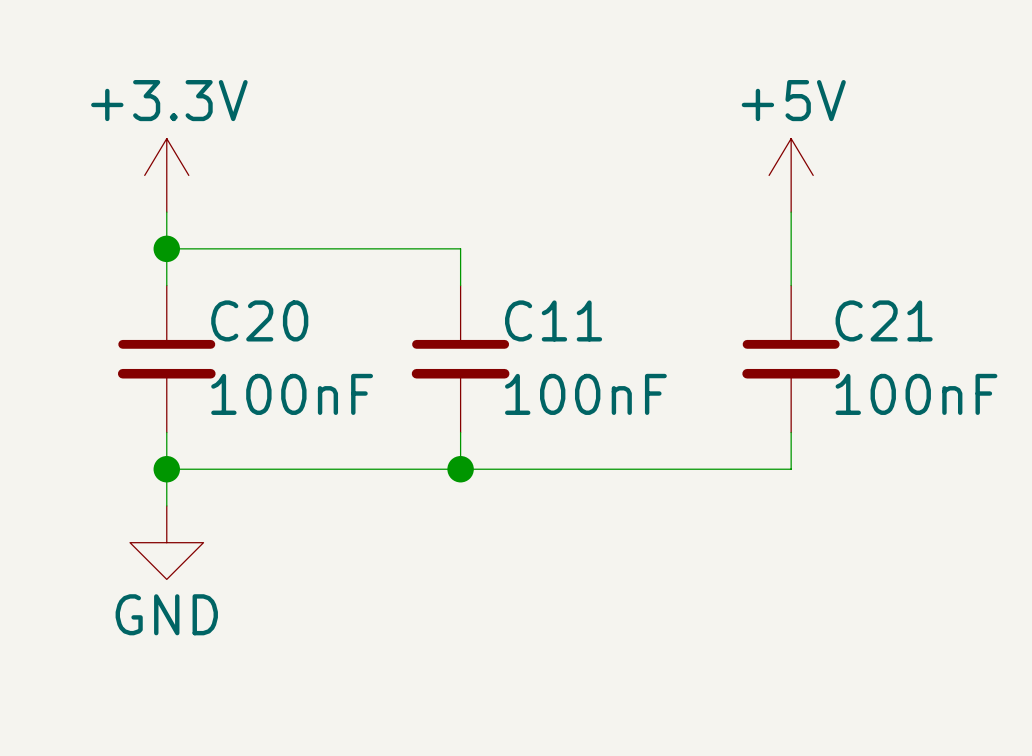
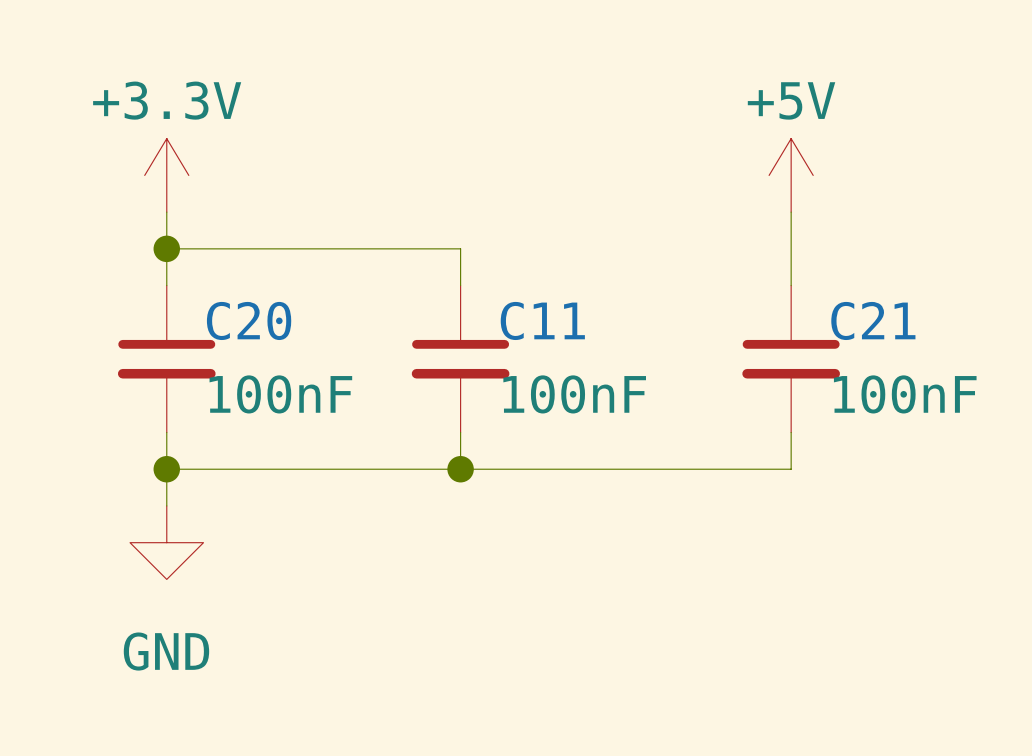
power symbol text position: GND (166, 614) -> GND (166, 651)

